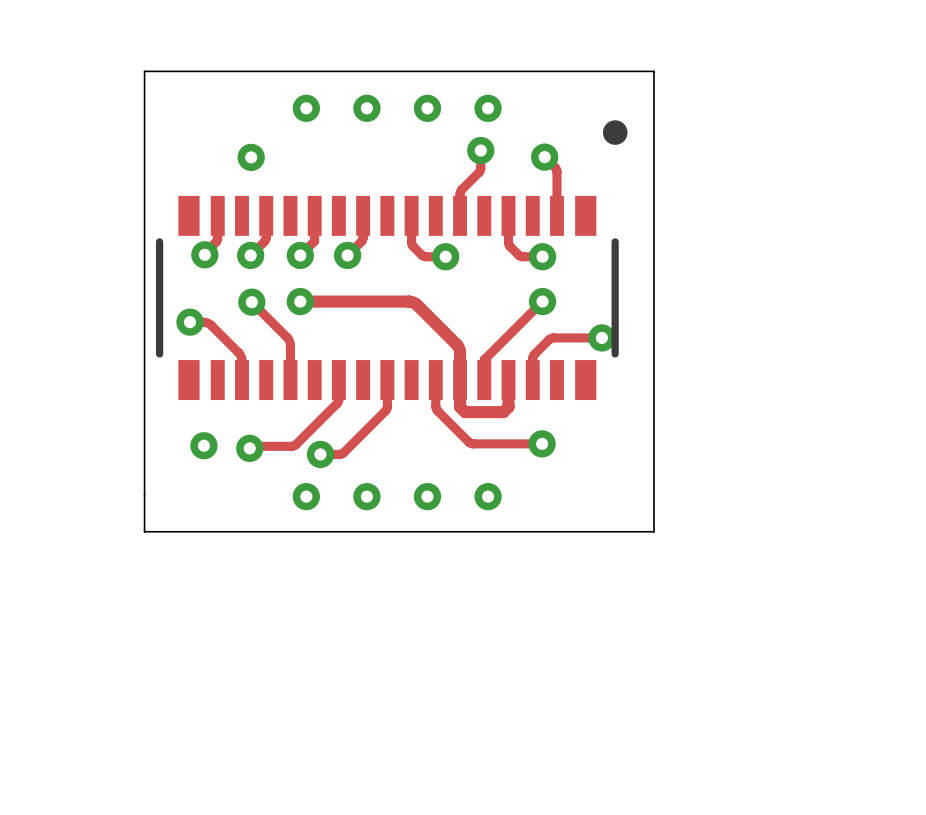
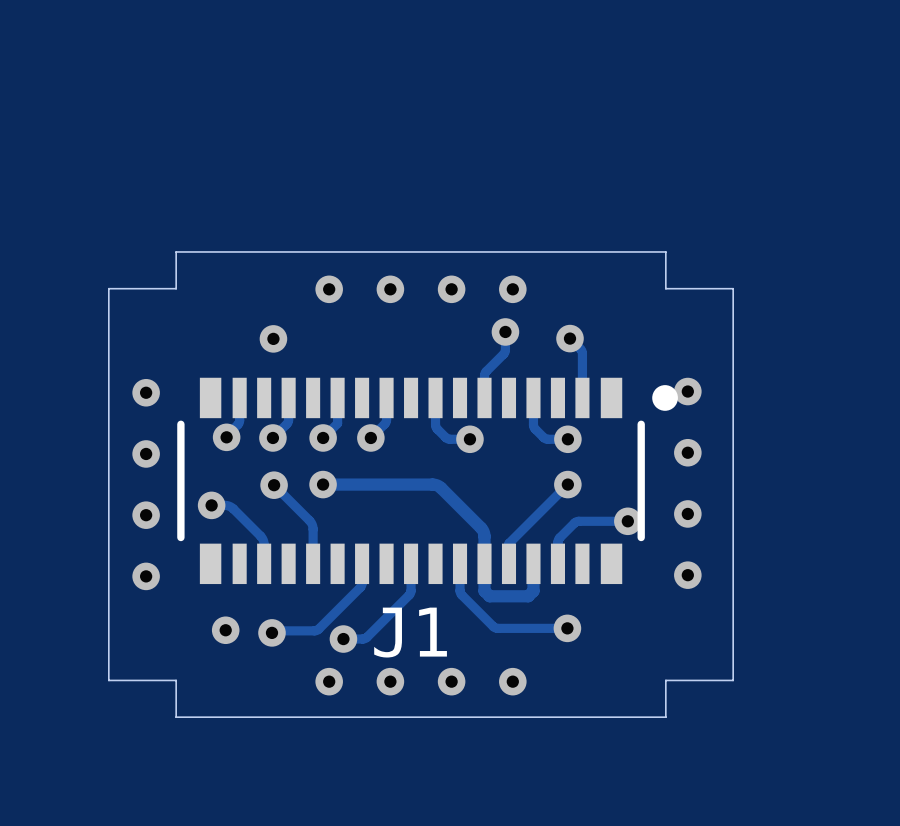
board edge: (154, 71) (144, 71) (144, 531) (154, 531) -> (176, 251) (176, 288) (108, 288) (108, 680) (176, 680) (176, 717)
board edge: (639, 71) (654, 71) (654, 531) (639, 531) -> (665, 251) (665, 288) (733, 288) (733, 680) (665, 680) (665, 717)
drawing: [602, 120, 628, 145] -> none
via: none -> (687, 391)
via: none -> (146, 392)
via: none -> (687, 452)
via: none -> (146, 453)
J1: none -> (427, 480)
via: none -> (687, 513)
via: none -> (146, 515)
via: none -> (687, 575)
via: none -> (146, 576)

